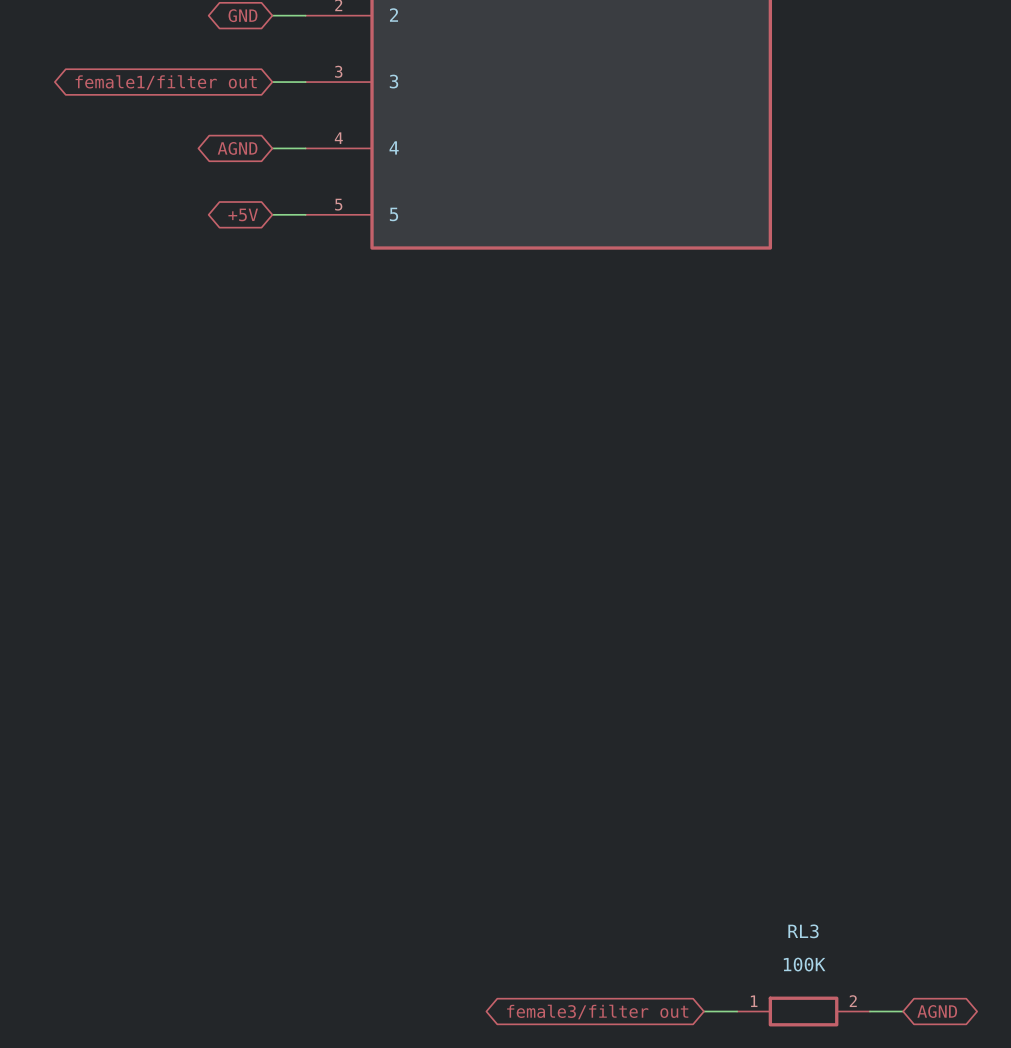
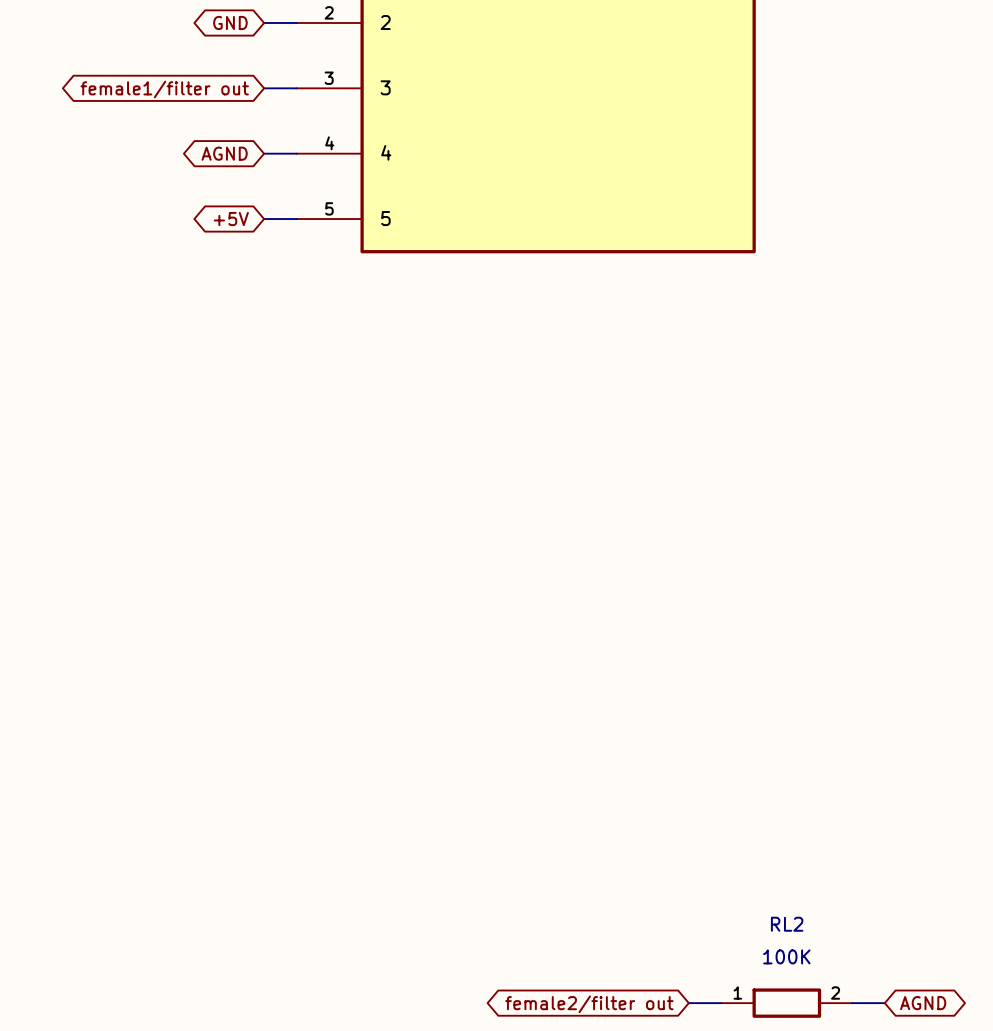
RL3 name: RL3 (803, 931) -> RL2 (787, 924)
global label: female3/filter out (597, 1012) -> female2/filter out (589, 1004)

